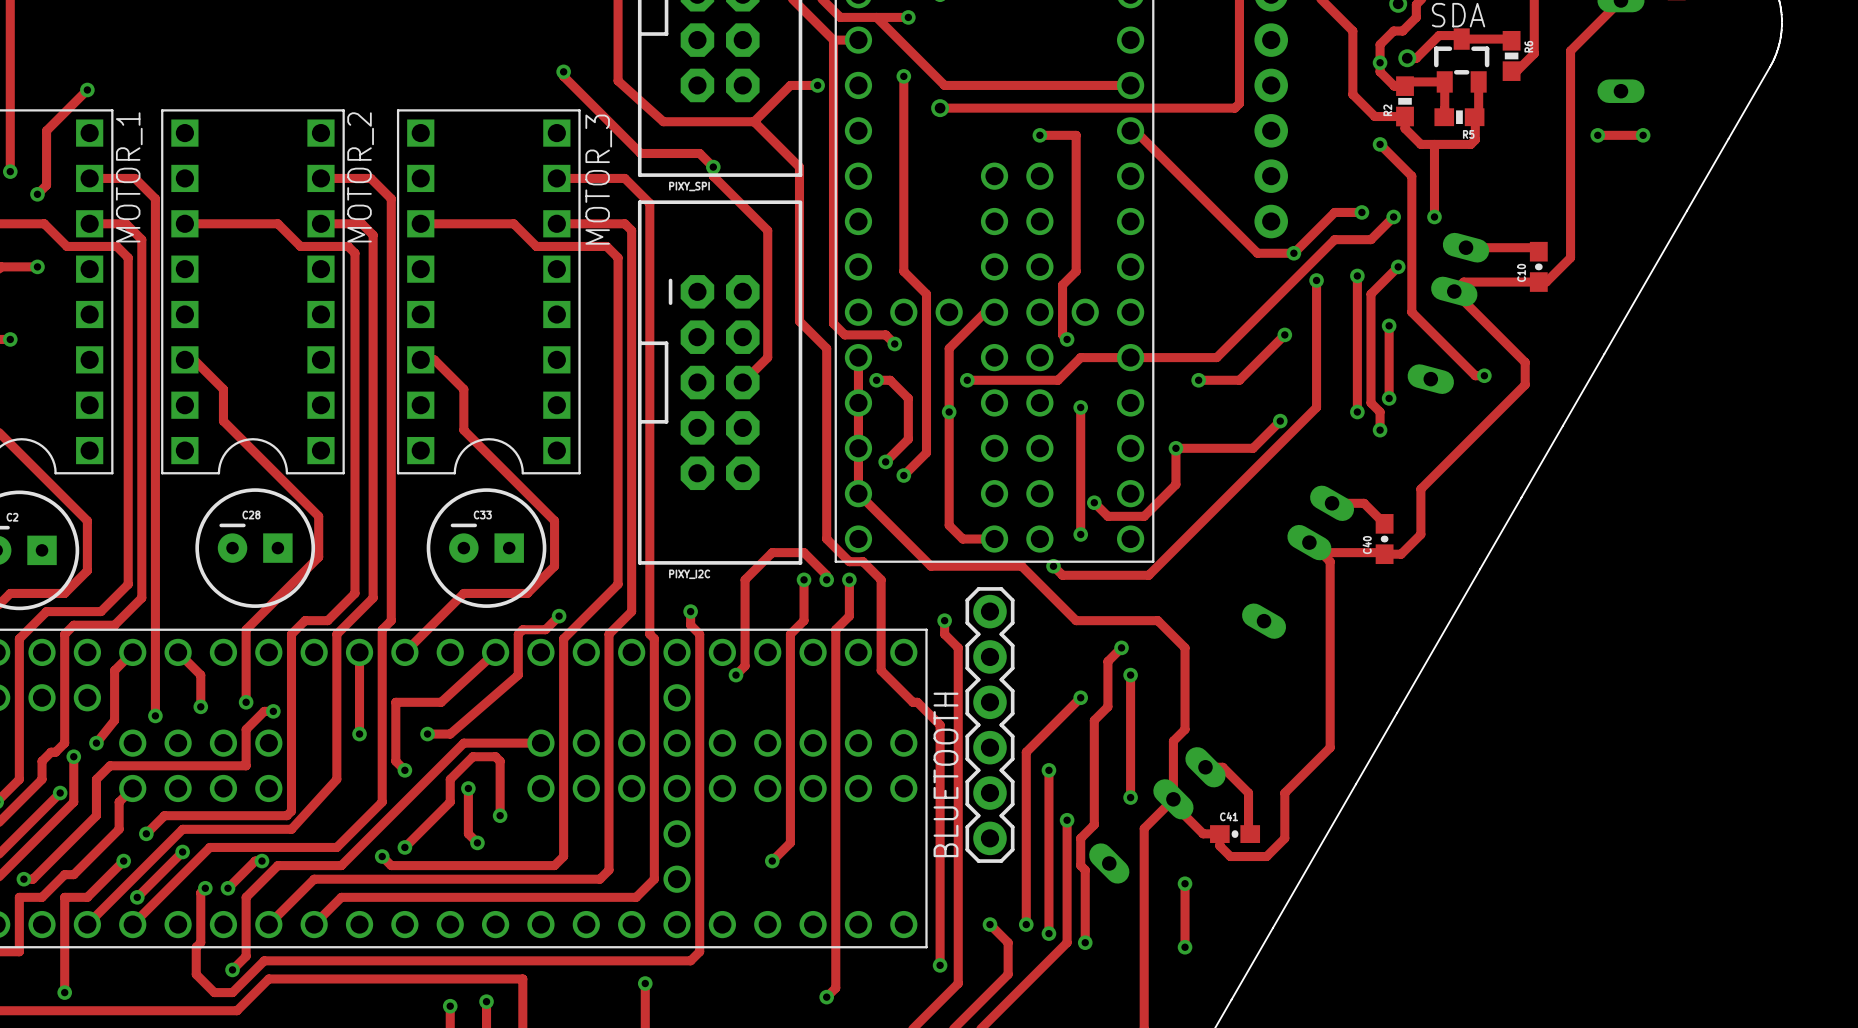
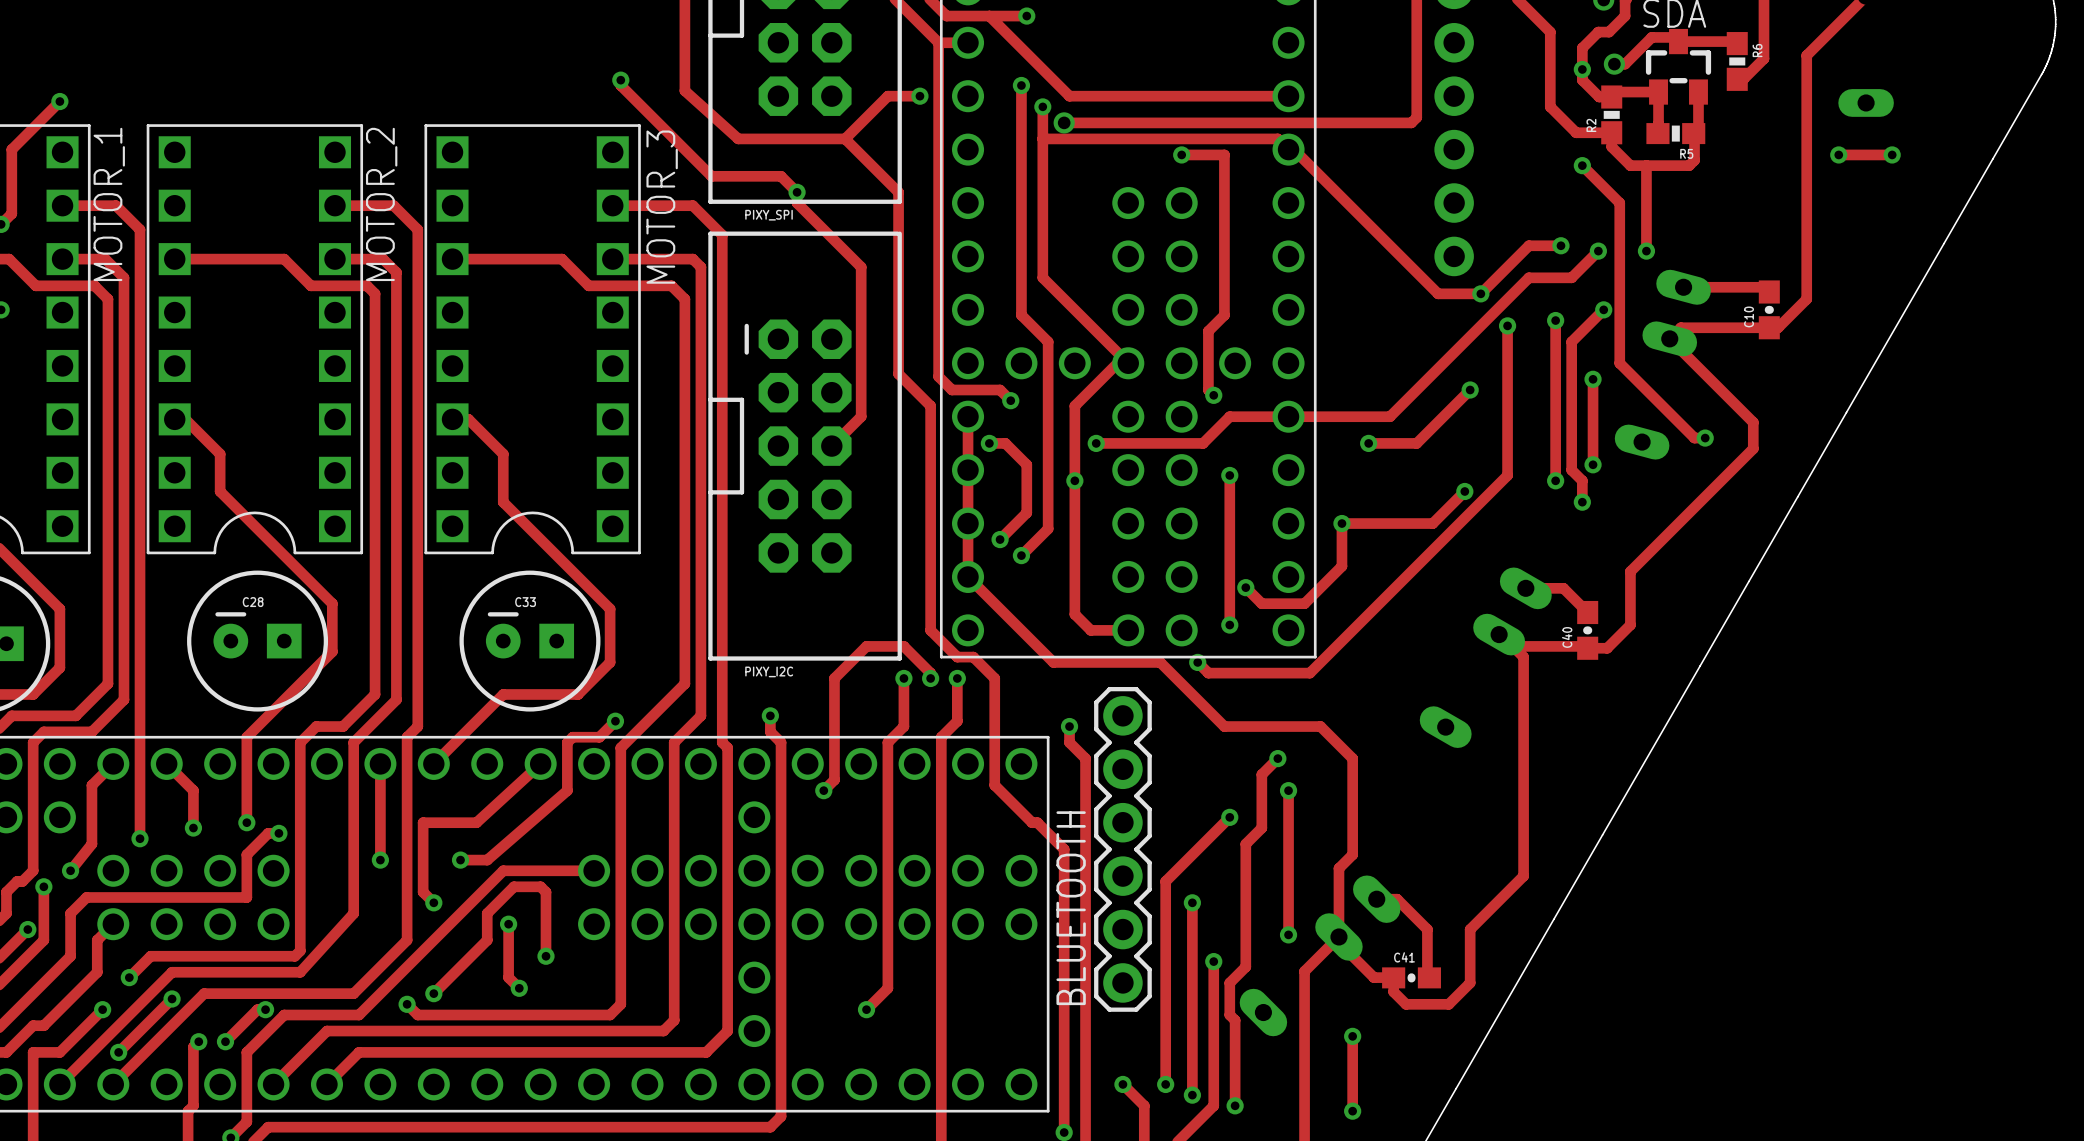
track: none -> (1042, 106) (1042, 277) (1128, 363)
via: none -> (1042, 106)
track: none -> (1042, 138) (1277, 138) (1288, 149)

